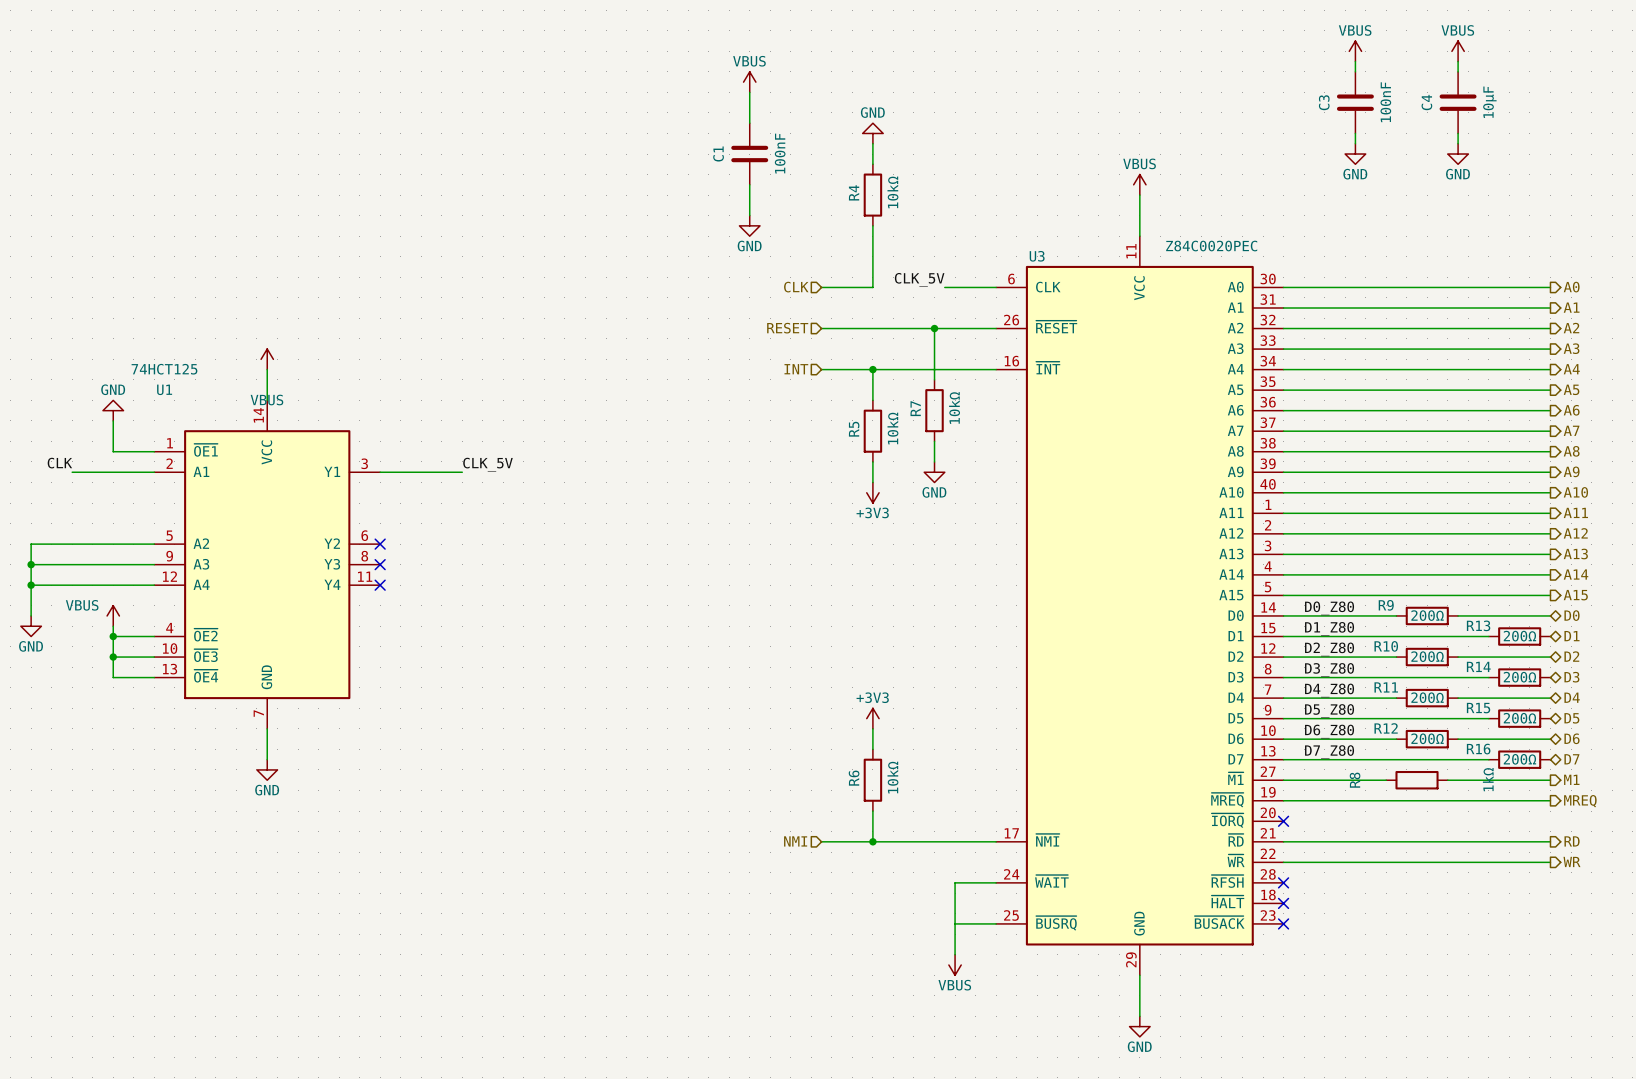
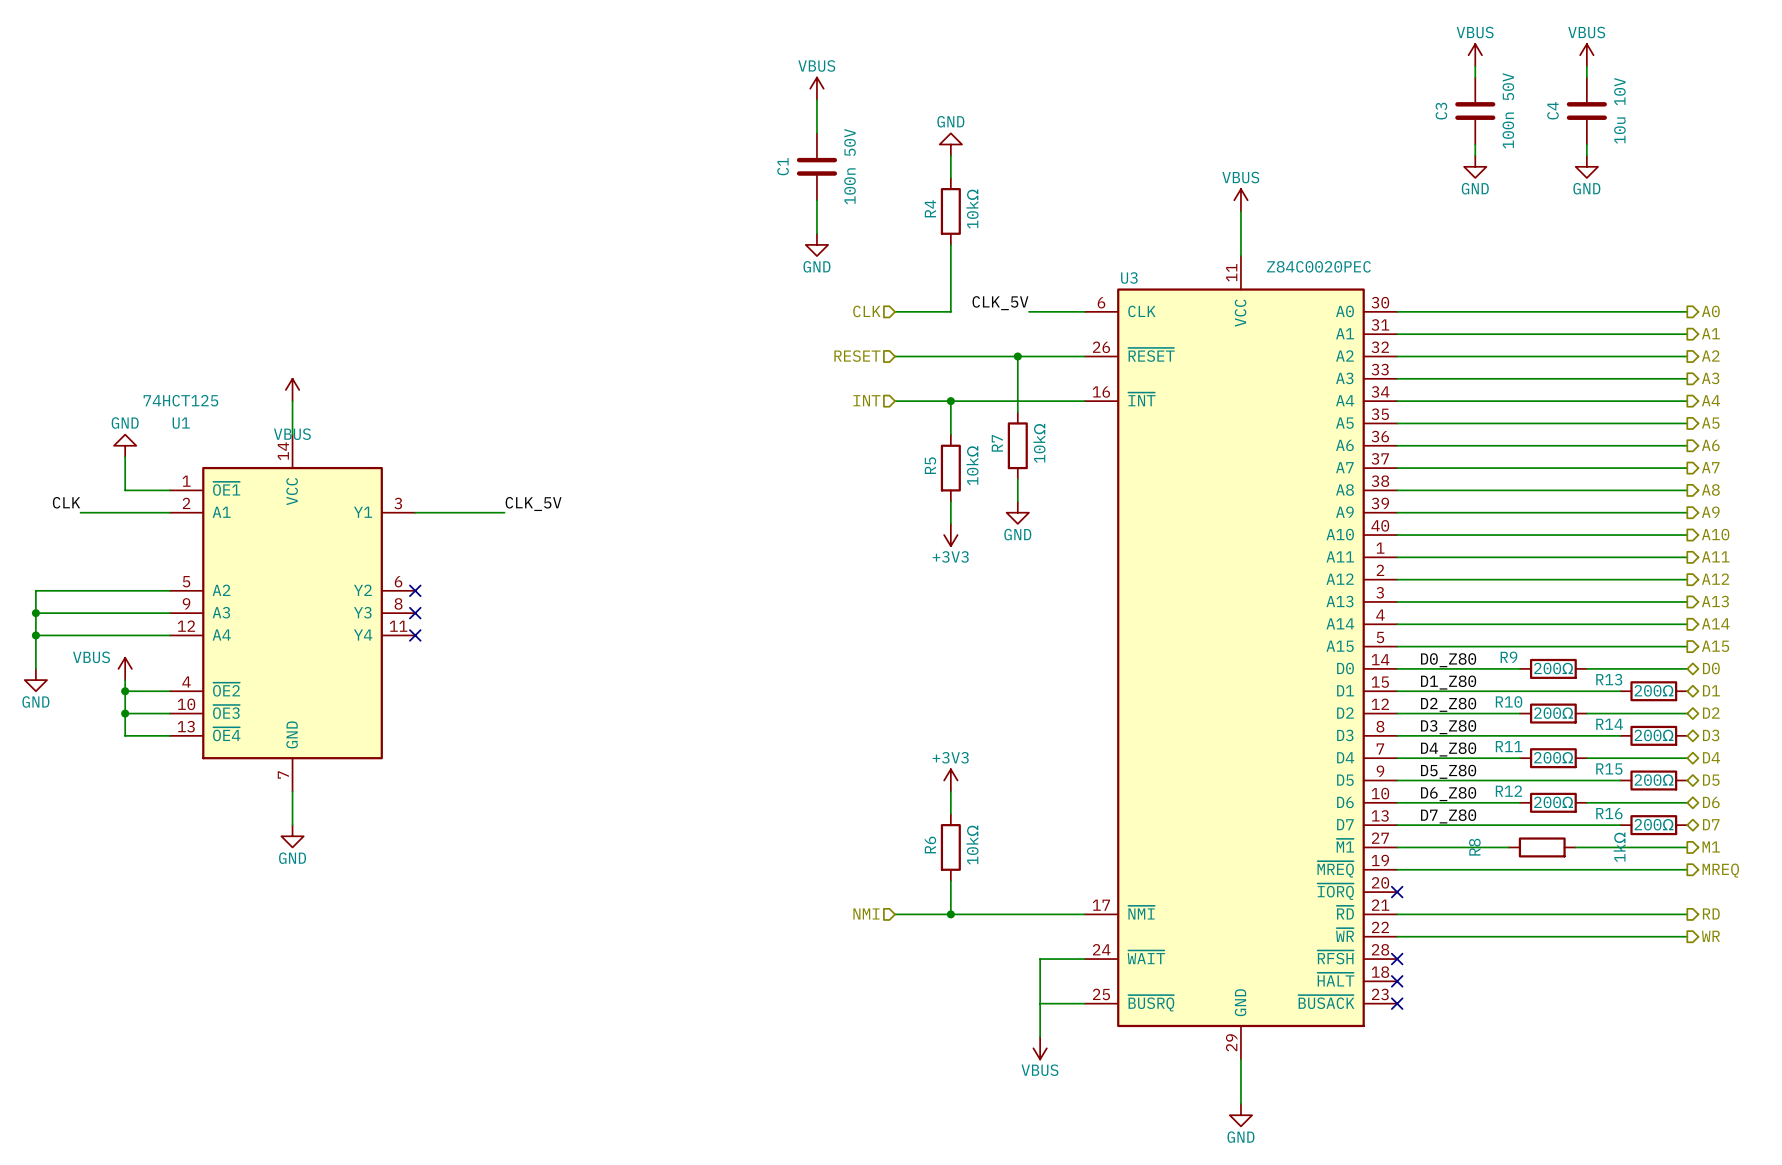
C3 value: 100nF (1385, 102) -> 100n 50V (1508, 110)
C4 value: 10µF (1489, 102) -> 10u 10V (1619, 110)
C1 value: 100nF (780, 153) -> 100n 50V (850, 166)

